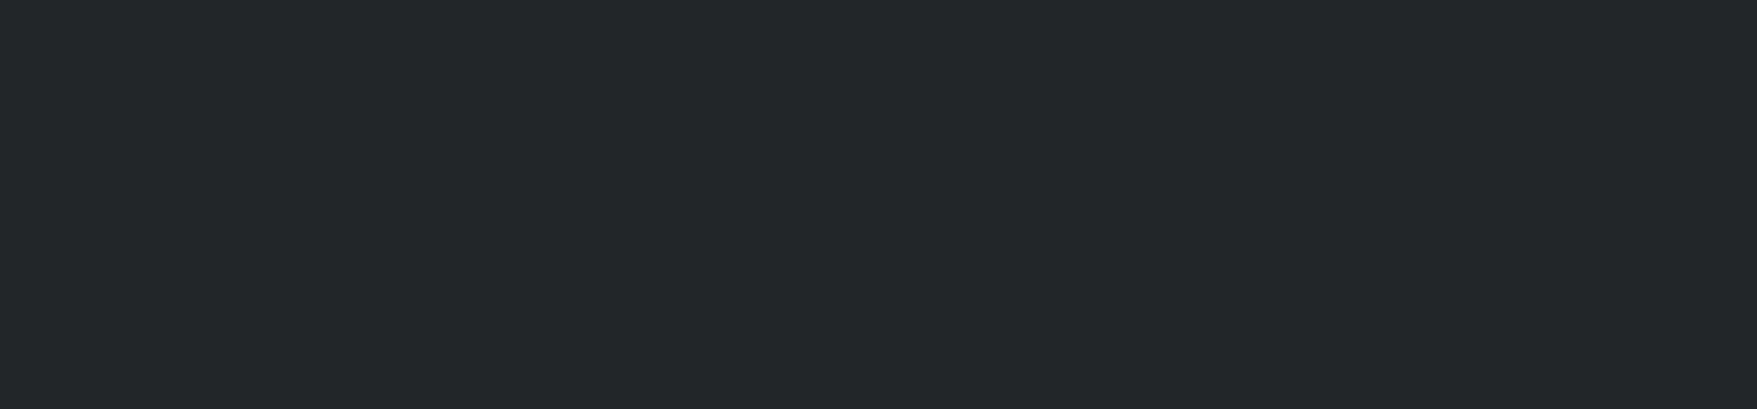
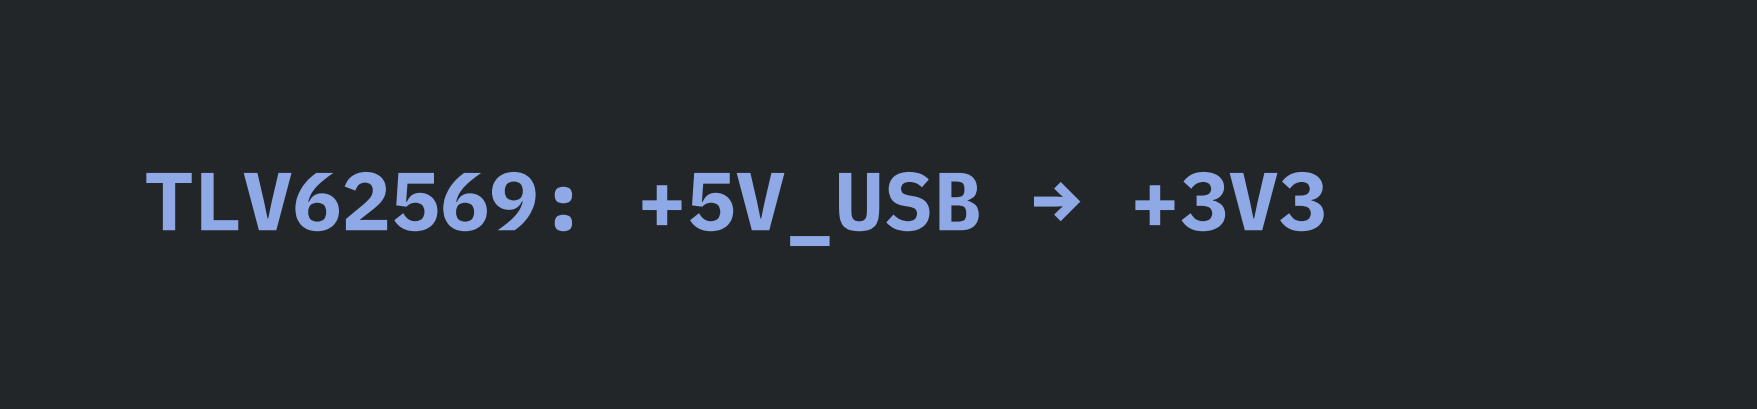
text: none -> TLV62569: +5V_USB → +3V3 (735, 208)

